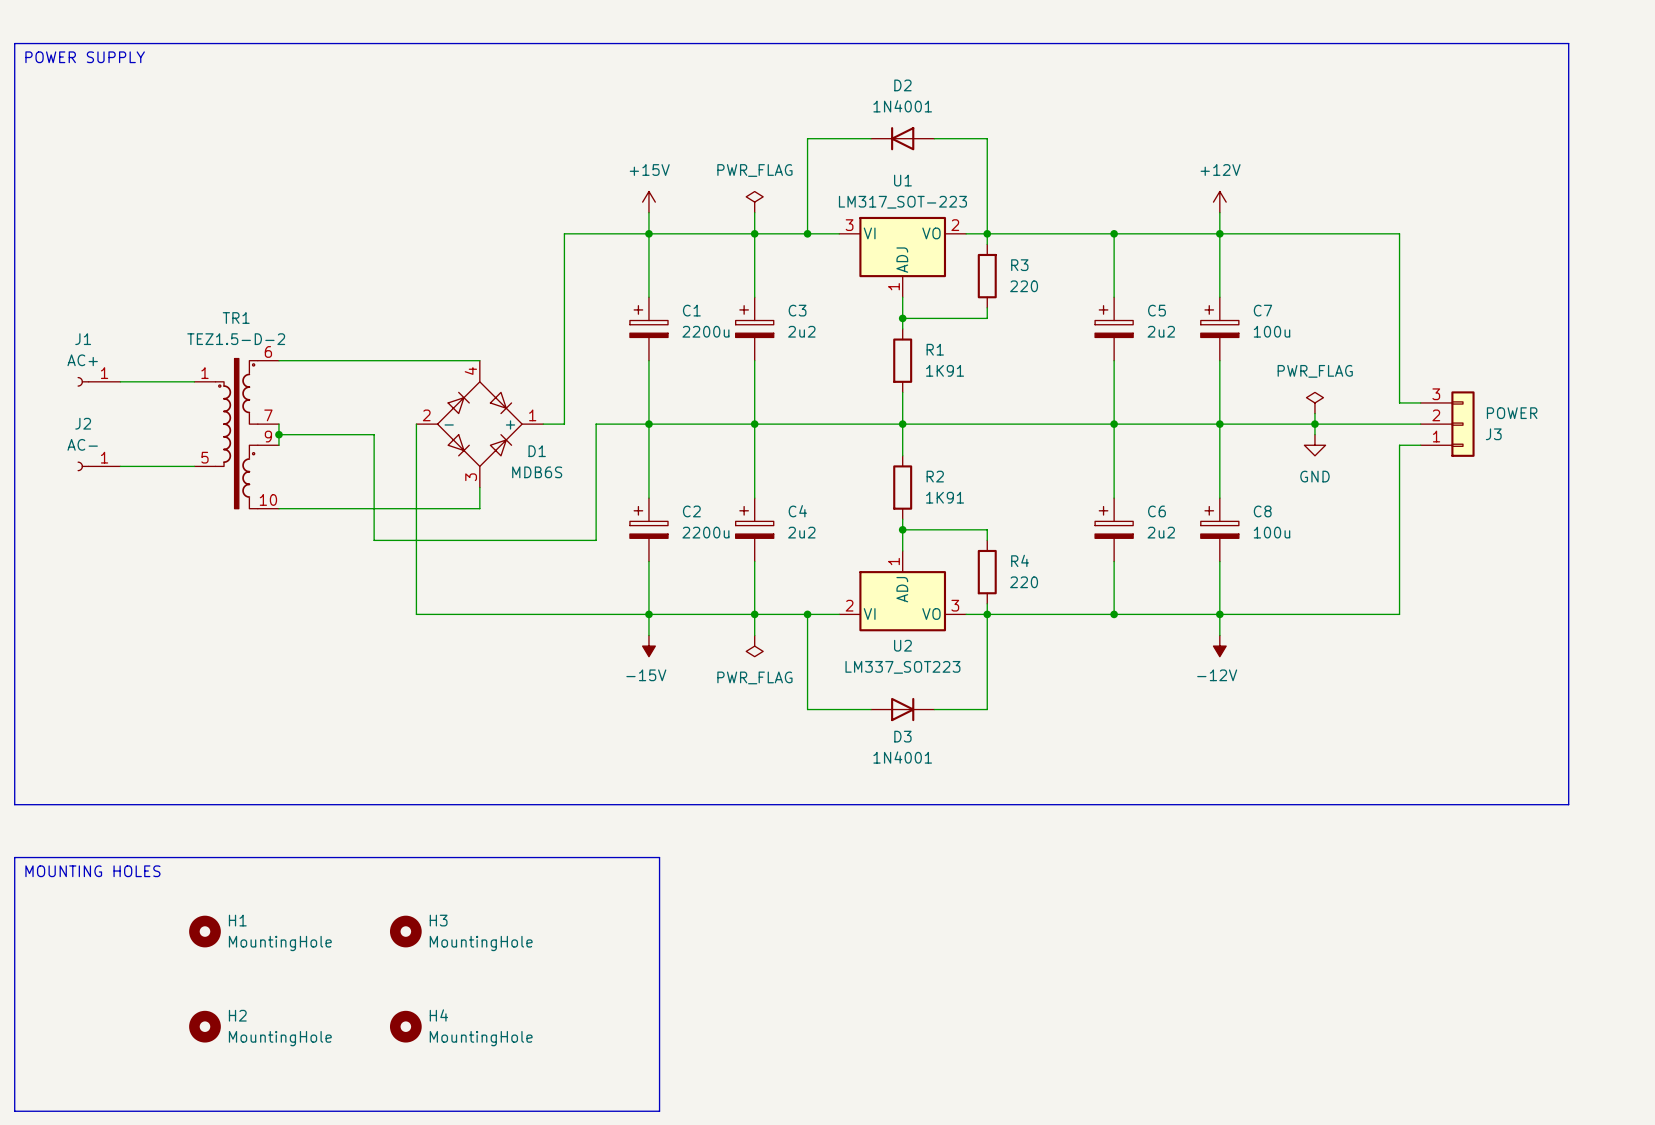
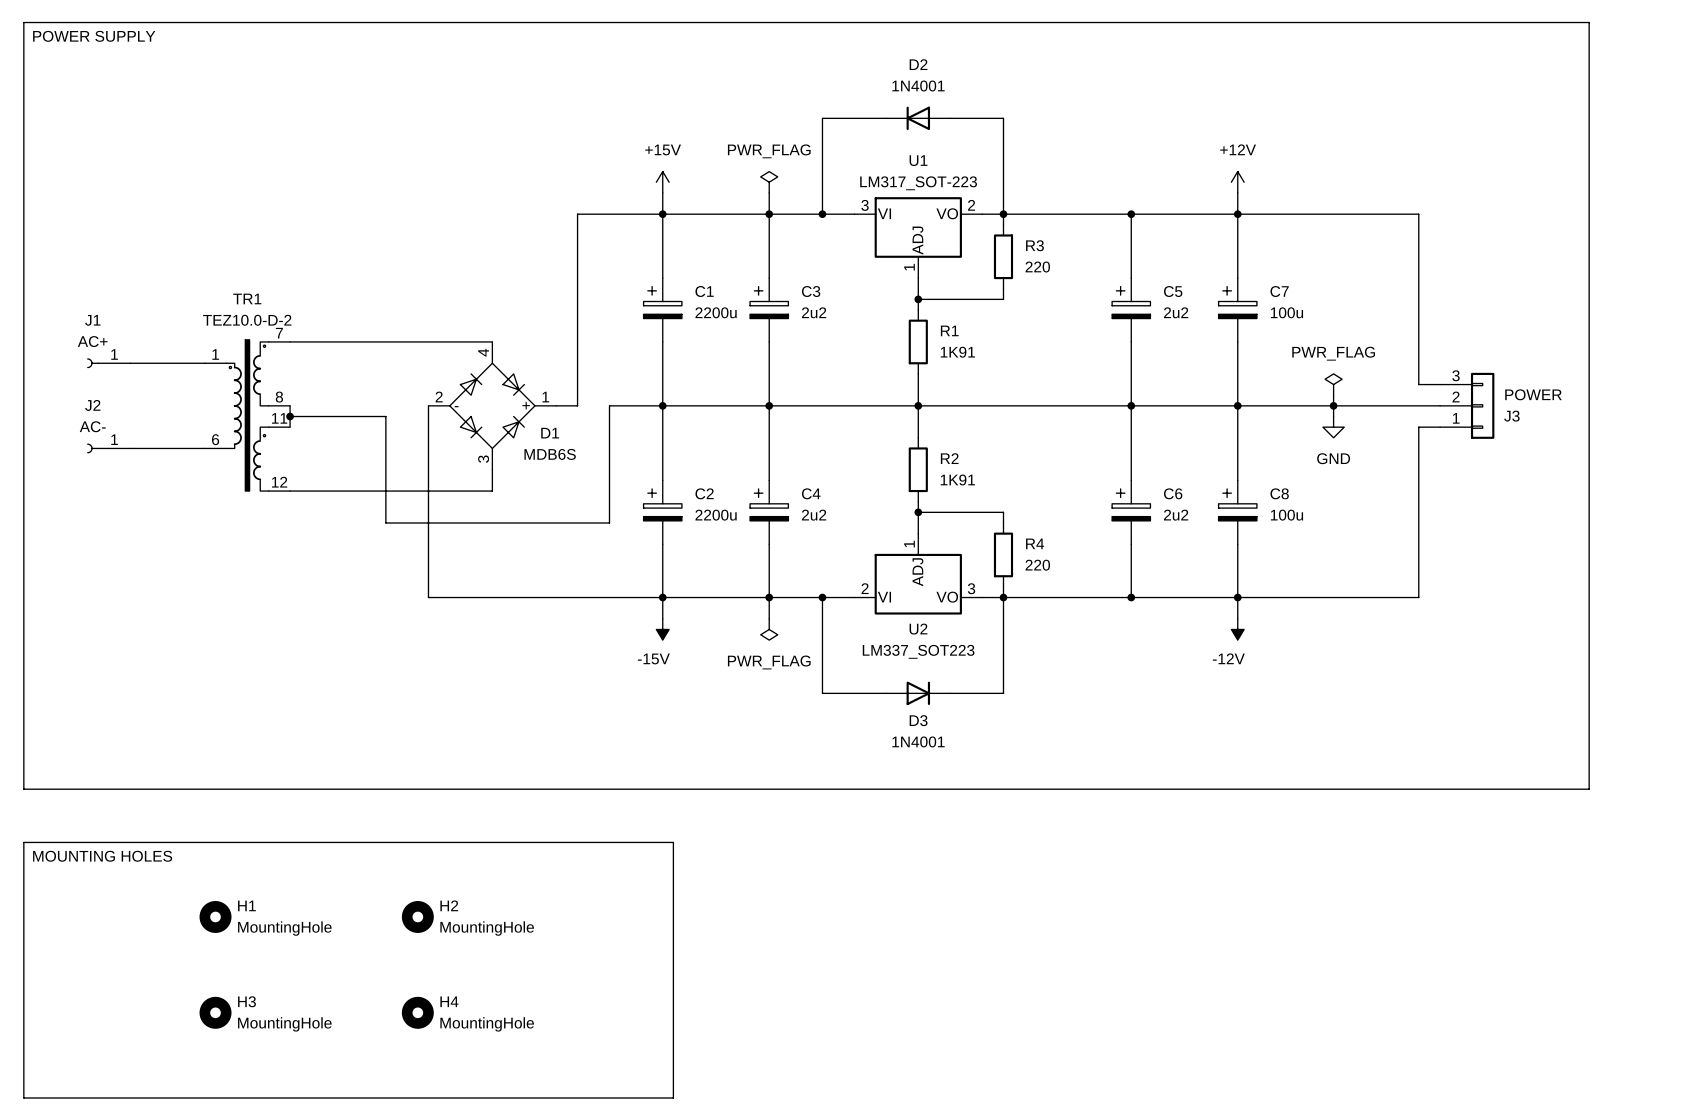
TR1 value: TEZ1.5-D-2 (236, 339) -> TEZ10.0-D-2 (247, 320)
TR1 pin number: 6 (268, 351) -> 7 (279, 333)
TR1 pin number: 7 (268, 415) -> 8 (279, 397)
TR1 pin number: 9 (268, 436) -> 11 (279, 418)
TR1 pin number: 5 (204, 457) -> 6 (215, 439)
TR1 pin number: 10 (268, 499) -> 12 (279, 482)
H3 name: H3 (438, 920) -> H2 (449, 905)
H2 name: H2 (237, 1015) -> H3 (247, 1001)

